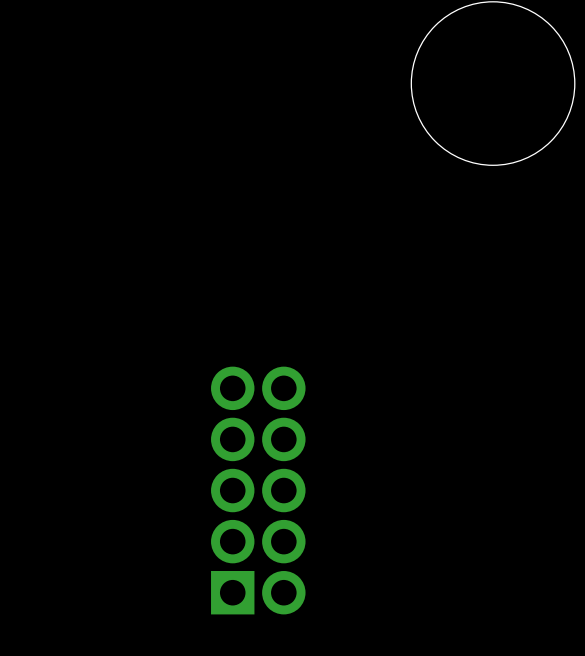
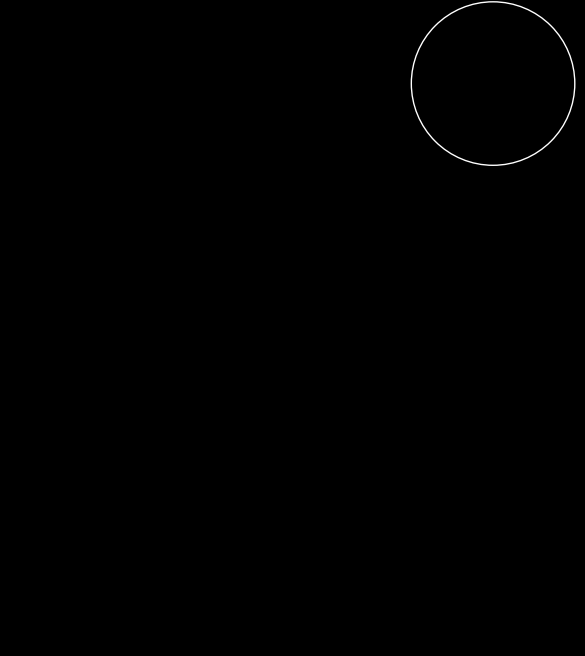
part: (258, 490) -> none

